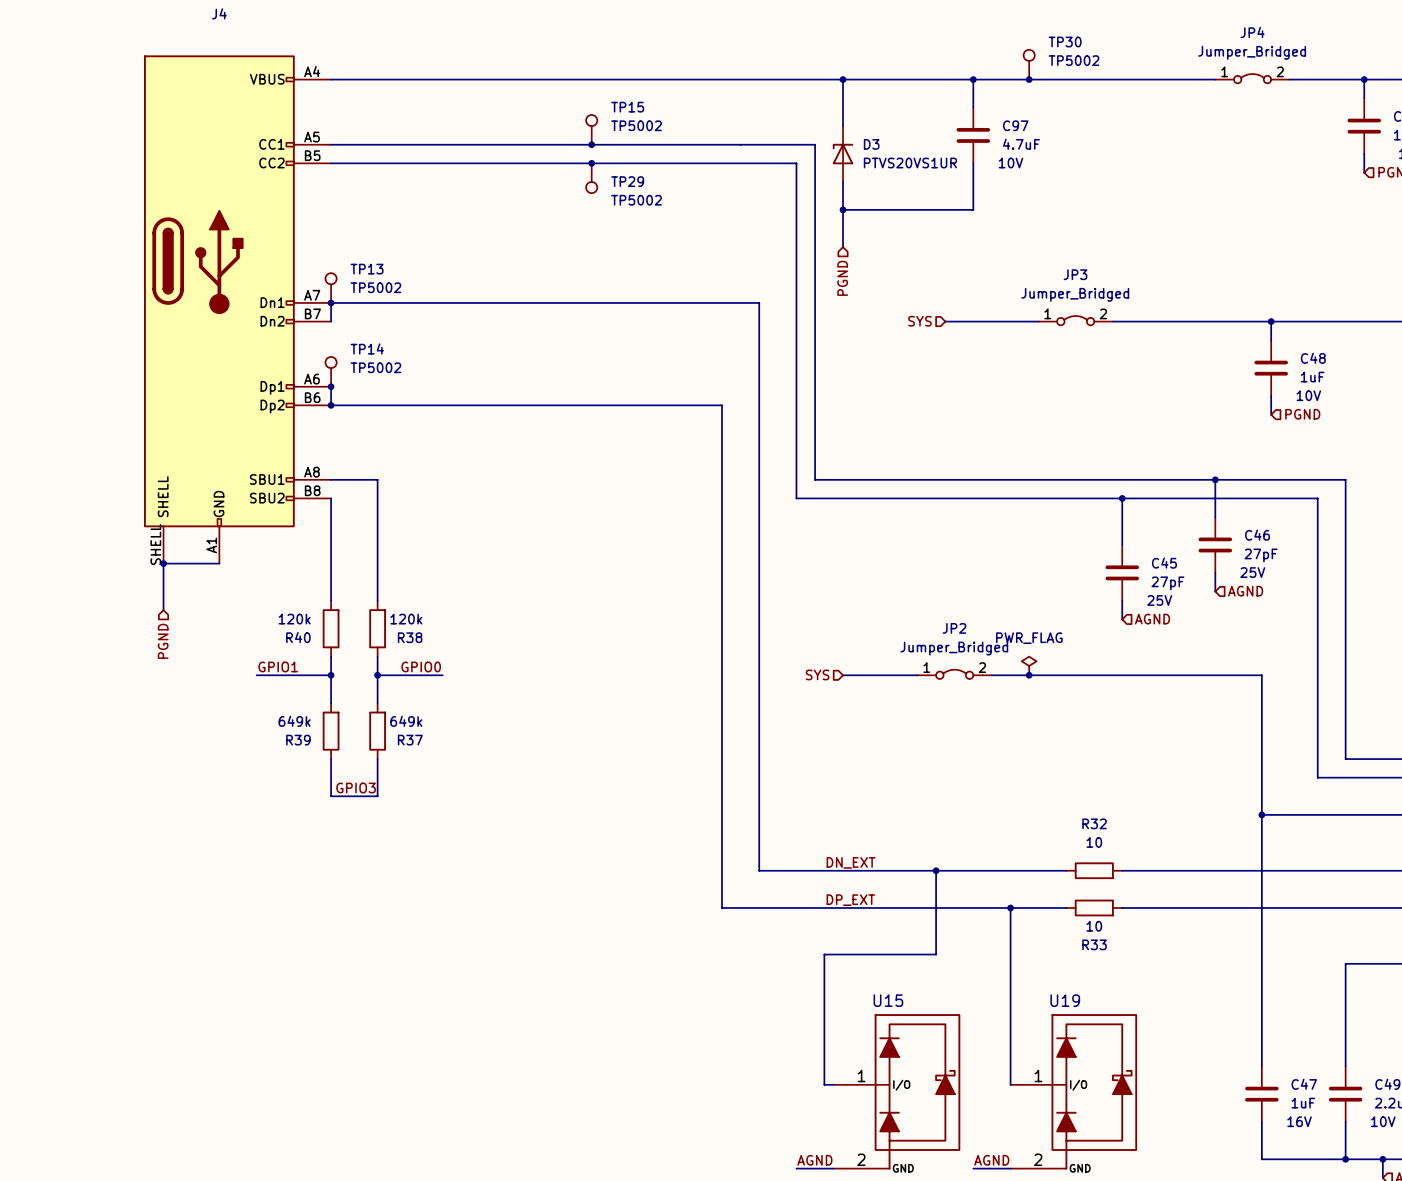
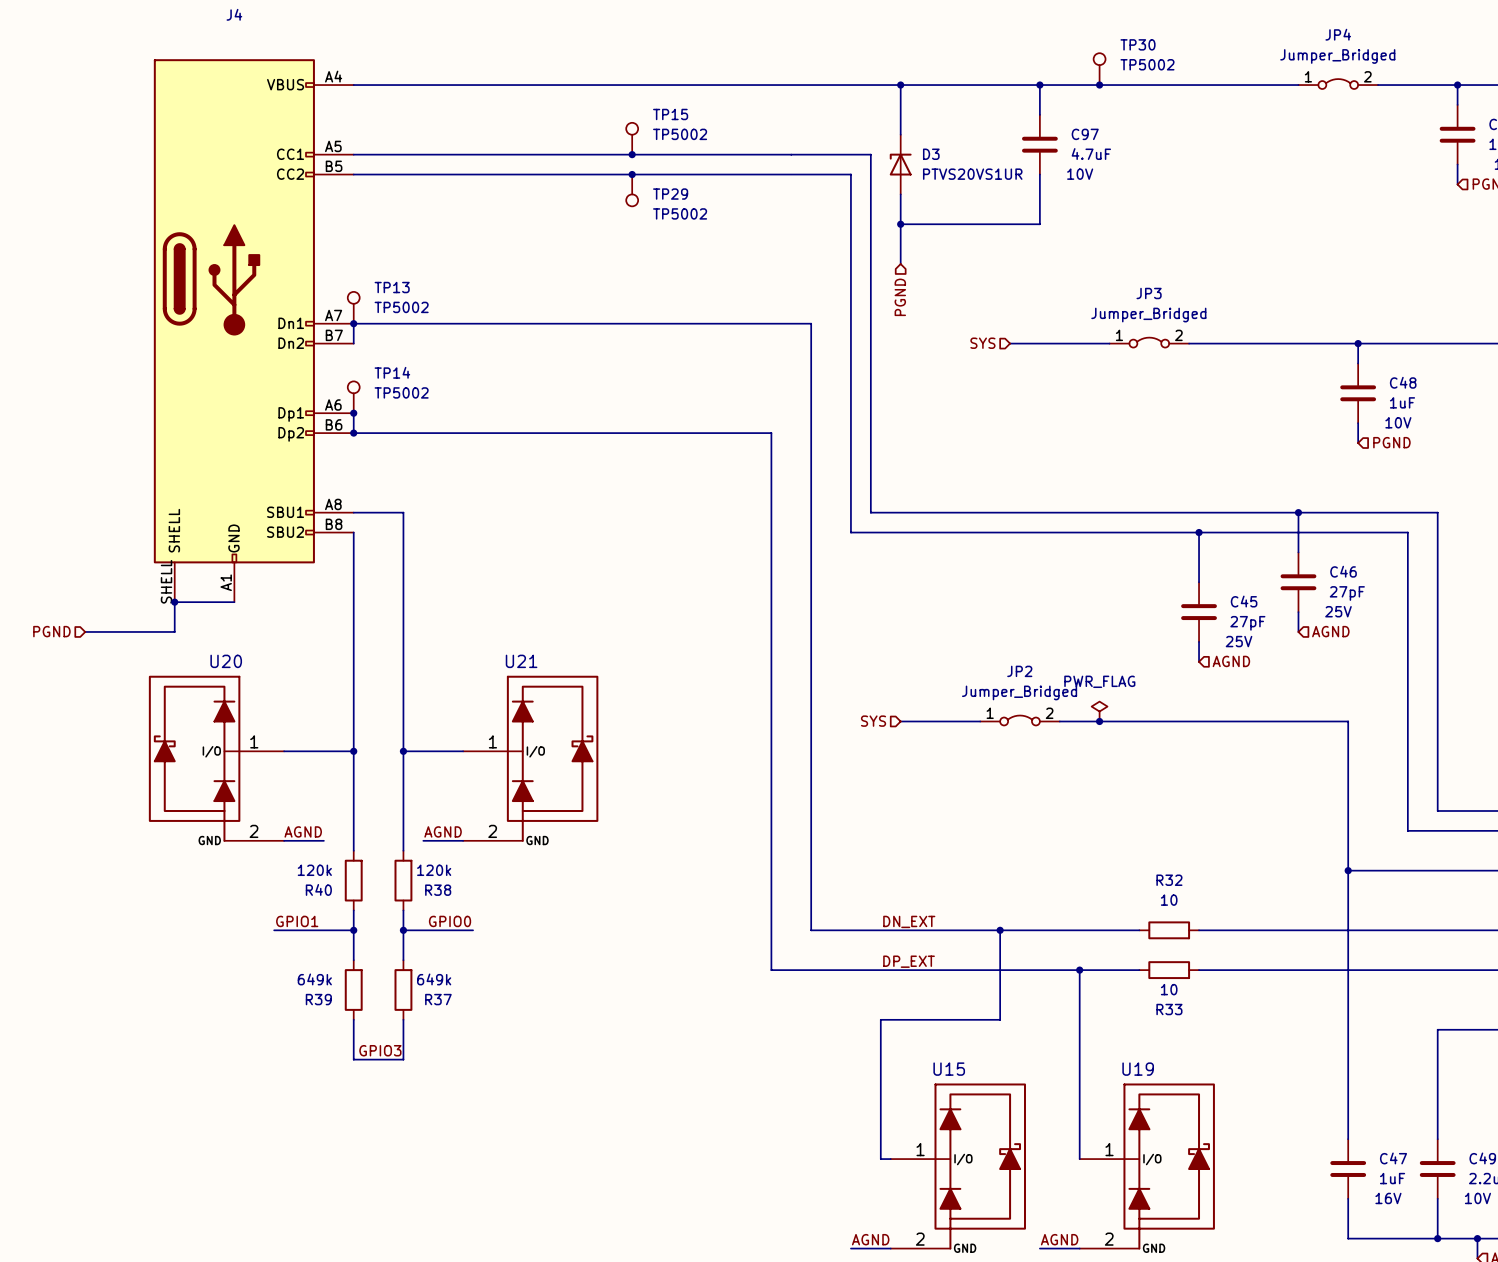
wire: (163, 591) (163, 610) -> (174, 631) (85, 631)
wire: none -> (353, 641) (353, 701)
wire: none -> (403, 641) (403, 701)
R40 position: (331, 628) -> (353, 880)
R38 position: (377, 628) -> (403, 880)
hierarchical label rotation: 0° (163, 641) -> 90° clockwise (51, 631)
hierarchical label position: PGND (163, 641) -> PGND (51, 631)
label: GPIO1 (278, 666) -> none
label: GPIO0 (421, 666) -> none
wire: (256, 675) (331, 675) -> none
junction: (331, 675) -> none
wire: (377, 675) (442, 675) -> none
junction: (377, 675) -> none
wire: none -> (284, 751) (353, 751) (353, 810)
junction: none -> (353, 751)
junction: none -> (403, 751)
wire: none -> (463, 751) (403, 751) (403, 810)
U20: none -> (216, 758)
U21: none -> (530, 758)
R39 position: (331, 731) -> (353, 989)
R37 position: (377, 731) -> (403, 989)
label: none -> AGND (303, 831)
label: none -> AGND (443, 831)
wire: none -> (284, 840) (323, 840)
wire: none -> (423, 840) (463, 840)
label: GPIO3 (356, 787) -> none
wire: (331, 796) (377, 796) -> none
wire: none -> (353, 910) (353, 960)
wire: none -> (403, 910) (403, 960)
label: none -> GPIO1 (297, 921)
label: none -> GPIO0 (450, 921)
wire: none -> (274, 930) (353, 930)
junction: none -> (353, 930)
wire: none -> (403, 930) (473, 930)
junction: none -> (403, 930)
wire: none -> (353, 1019) (353, 1059) (403, 1059) (403, 1019)
label: none -> GPIO3 (380, 1050)

